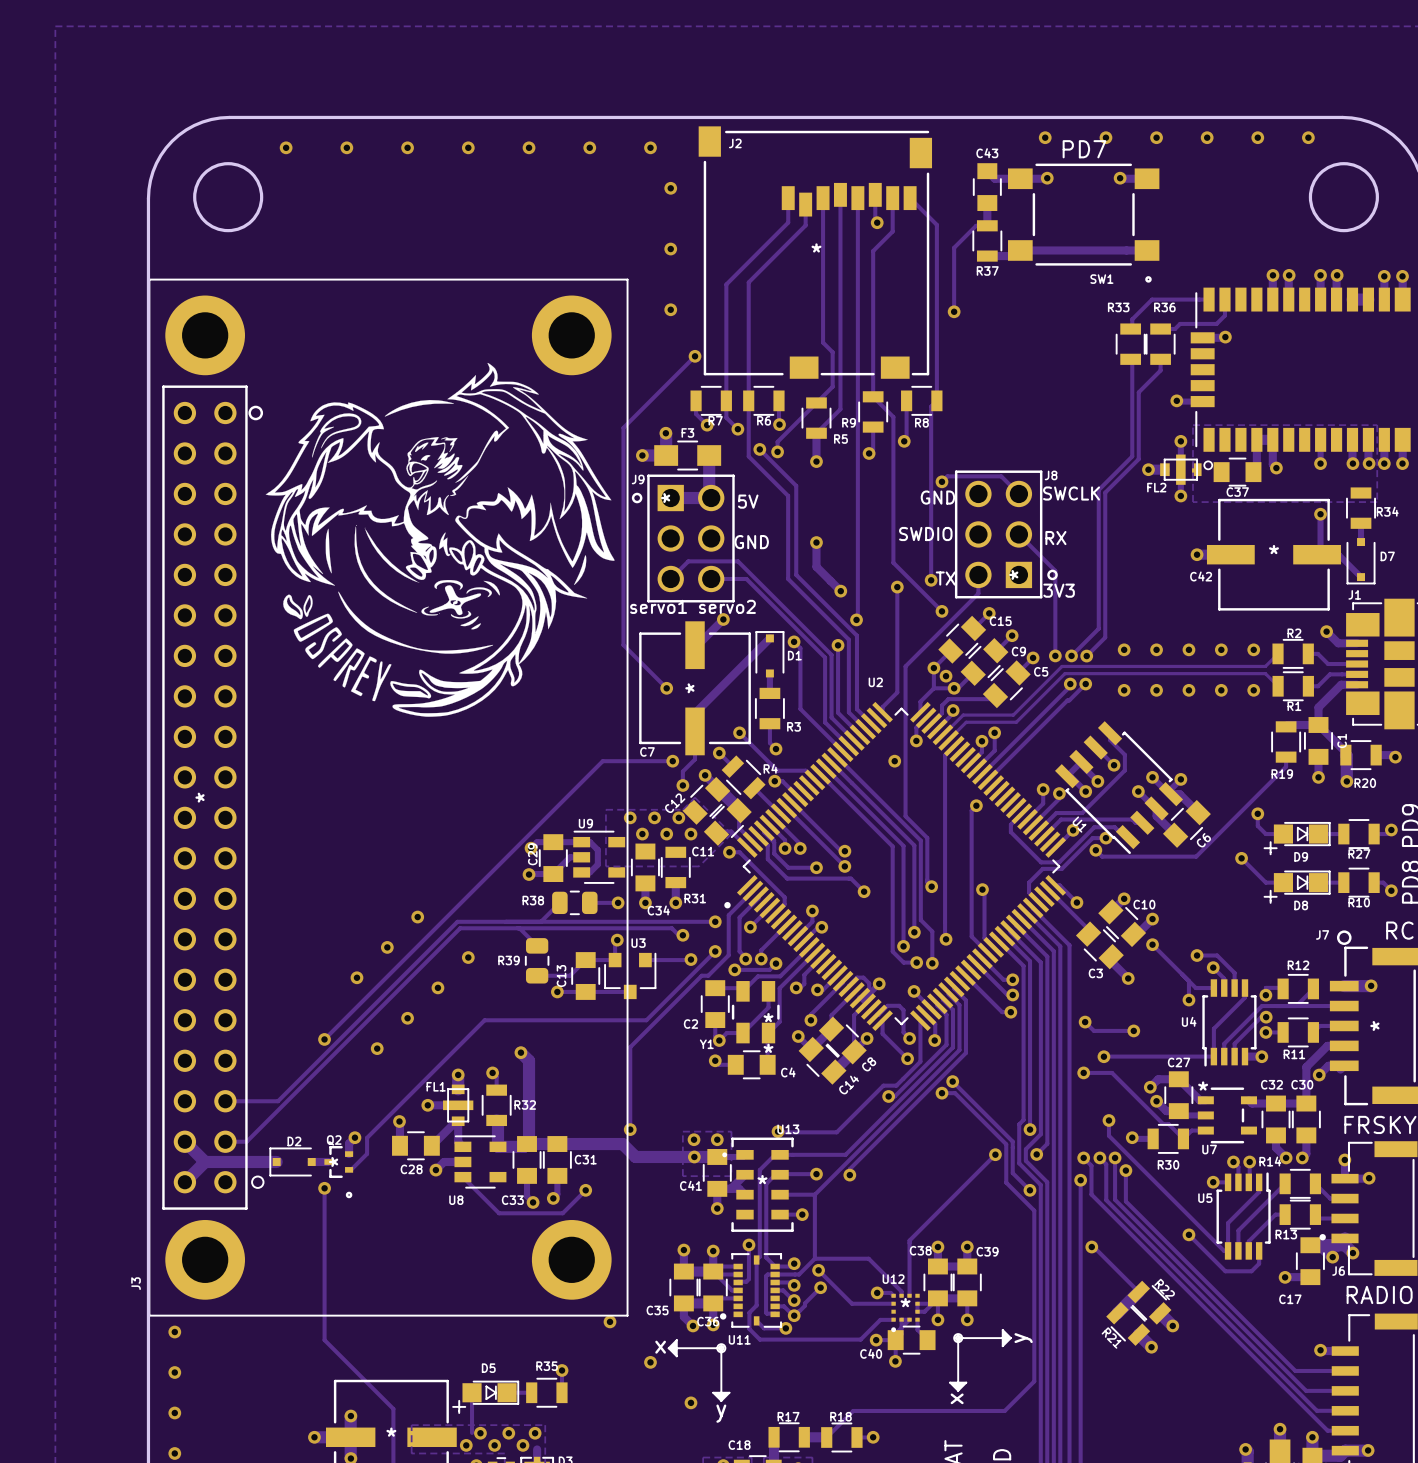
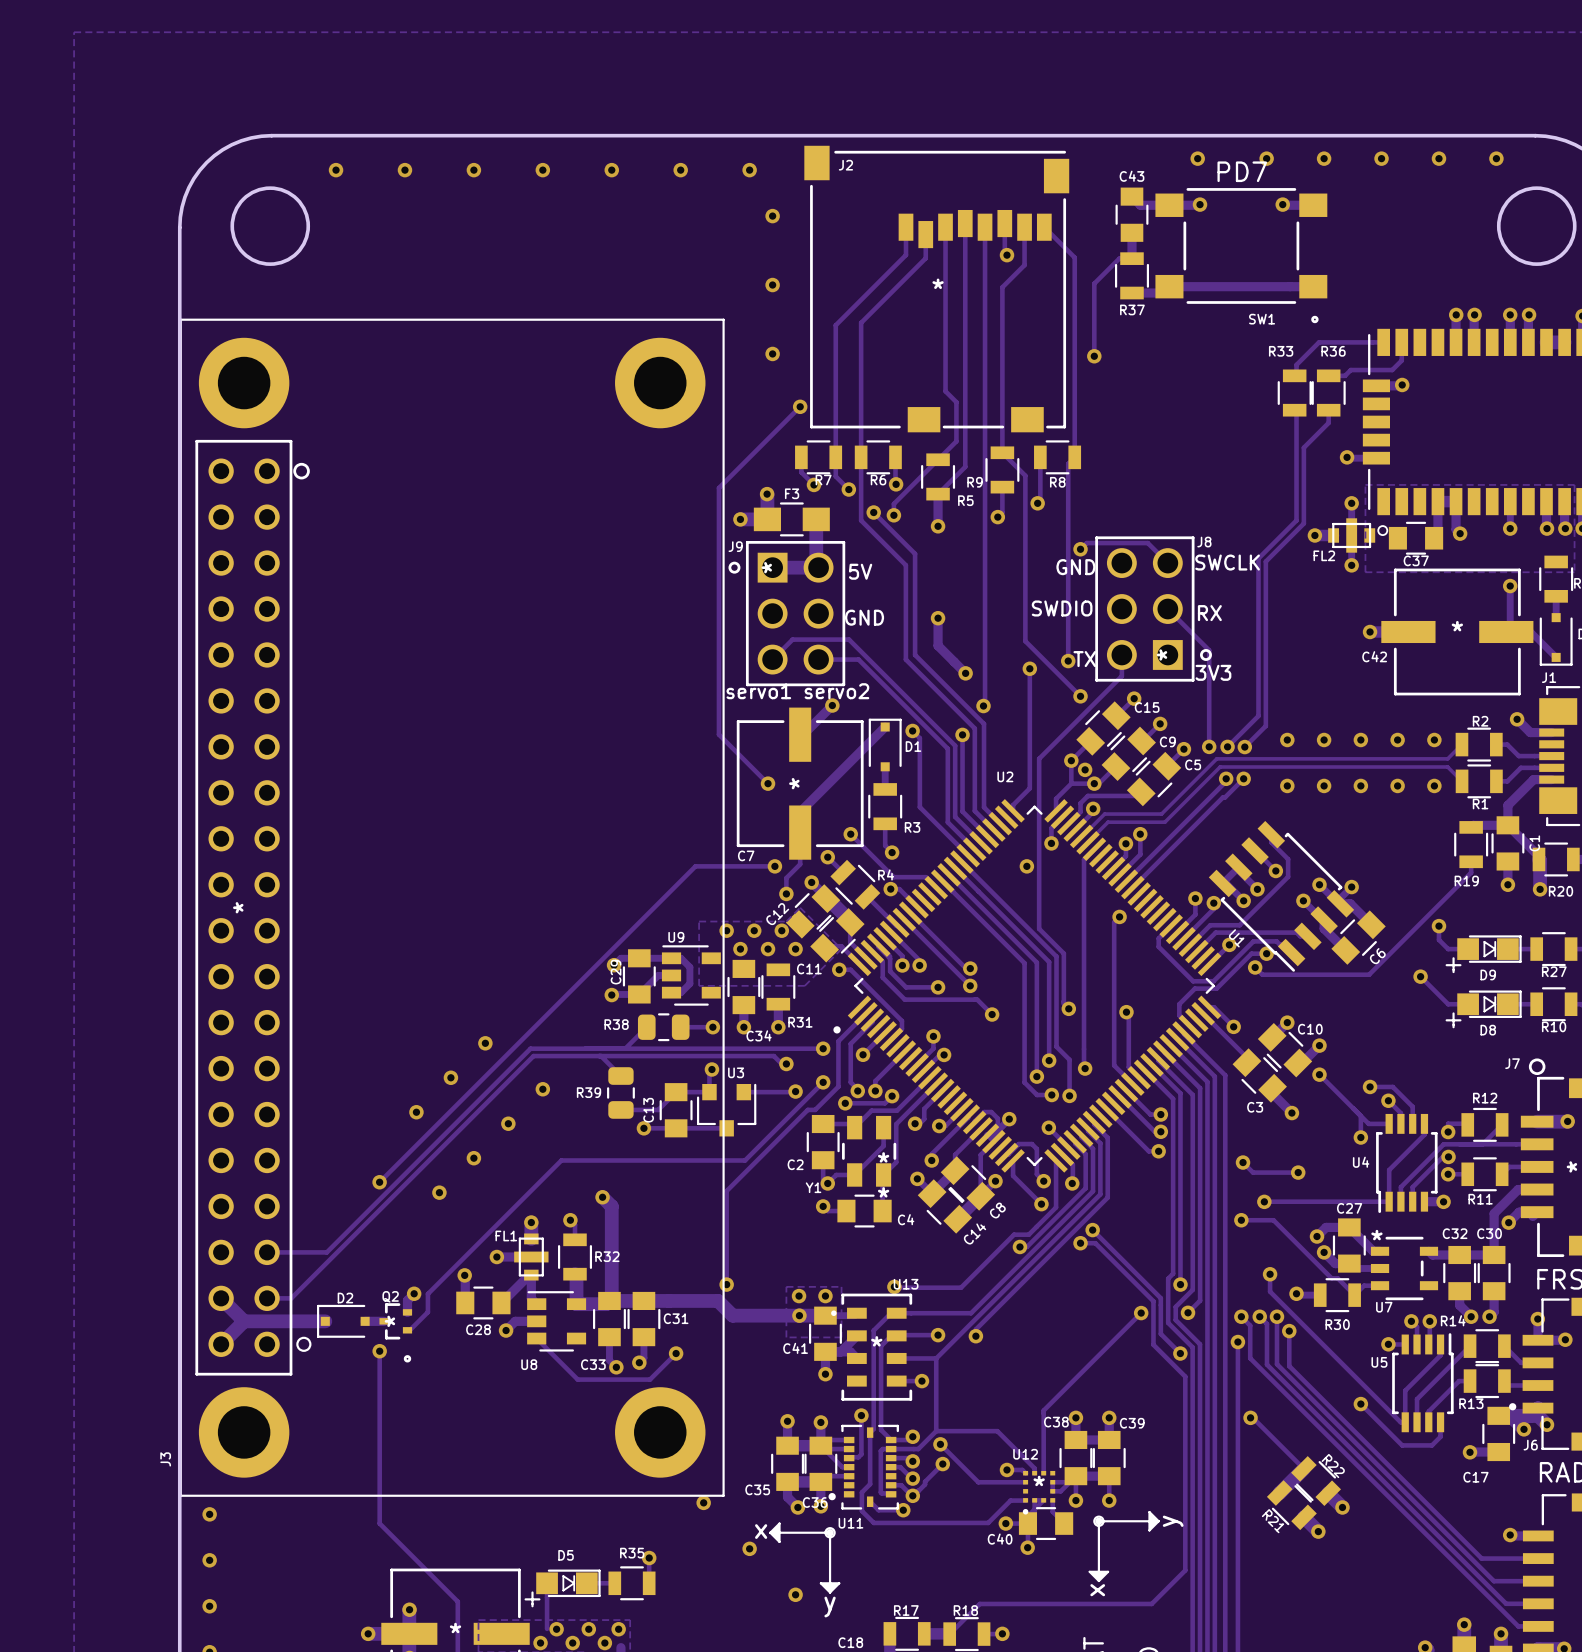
drawing: [265, 362, 615, 717] -> none

